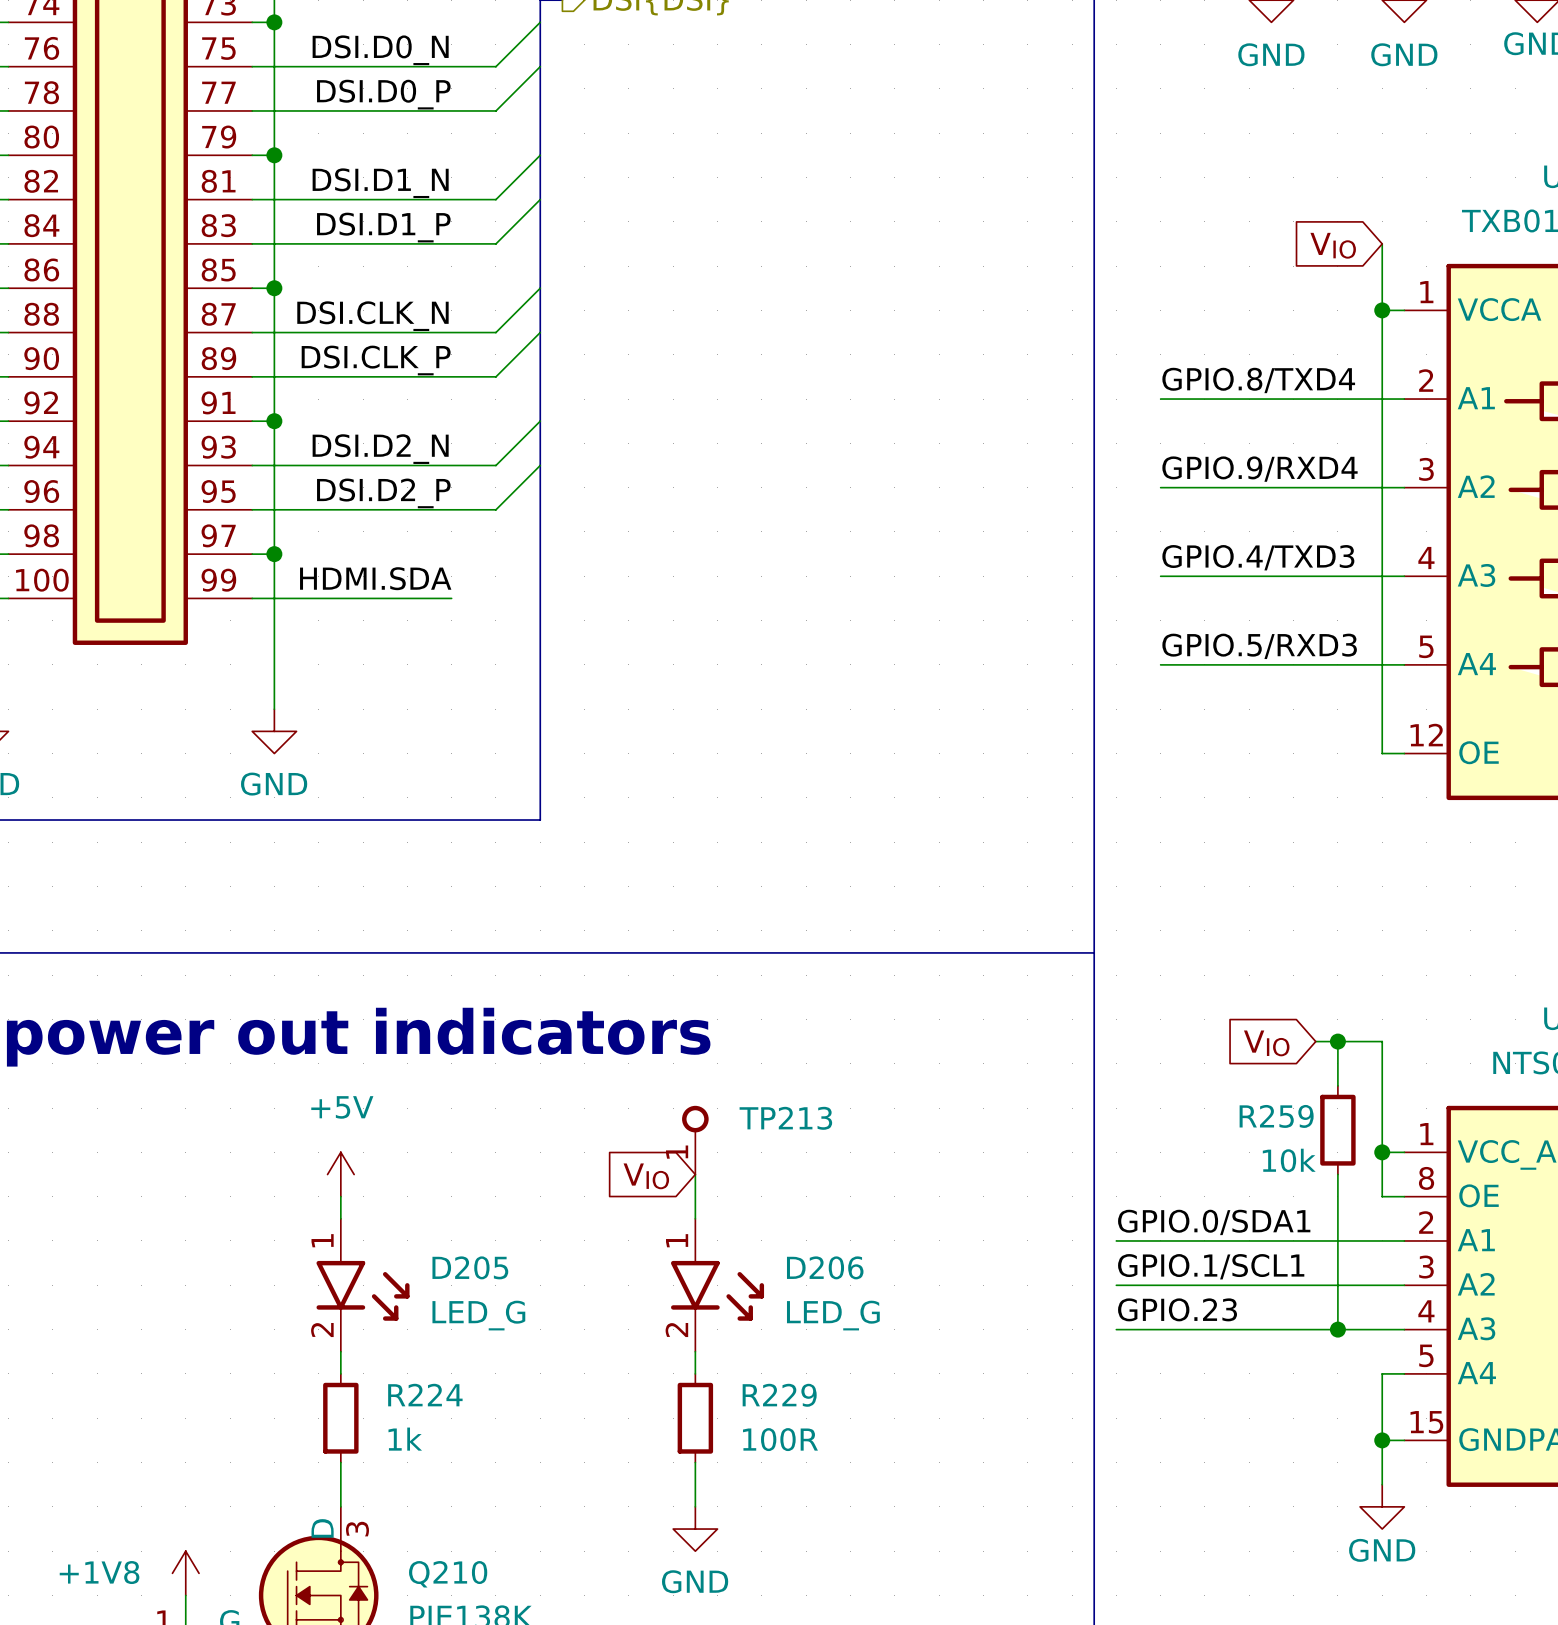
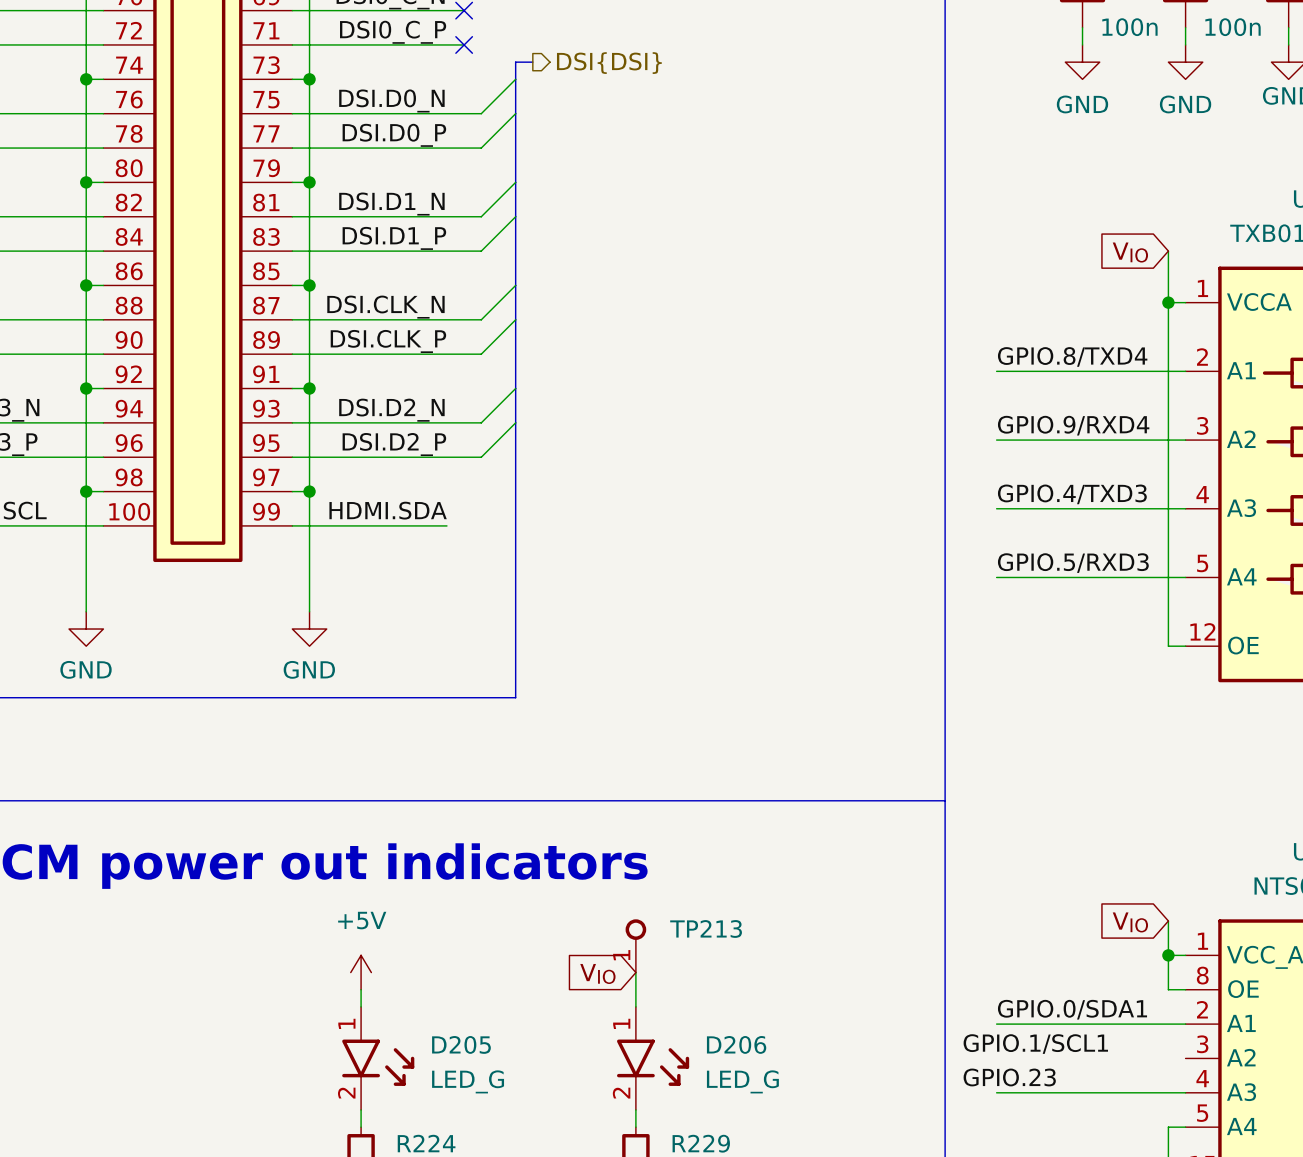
wire: (1315, 1041) (1382, 1041) (1382, 1108) -> none
wire: (1337, 1041) (1337, 1085) -> none
junction: (1337, 1041) -> none
global label position: VIO (1266, 1043) -> VIO (1130, 922)
R259: (1337, 1130) -> none
wire: (1337, 1174) (1337, 1329) -> none
label position: GPIO.0/SDA1 (1214, 1222) -> GPIO.0/SDA1 (1072, 1009)
wire: (1116, 1240) (1160, 1240) -> none
wire: (1116, 1285) (1404, 1285) -> none
wire: (1116, 1329) (1160, 1329) -> none
junction: (1337, 1329) -> none

